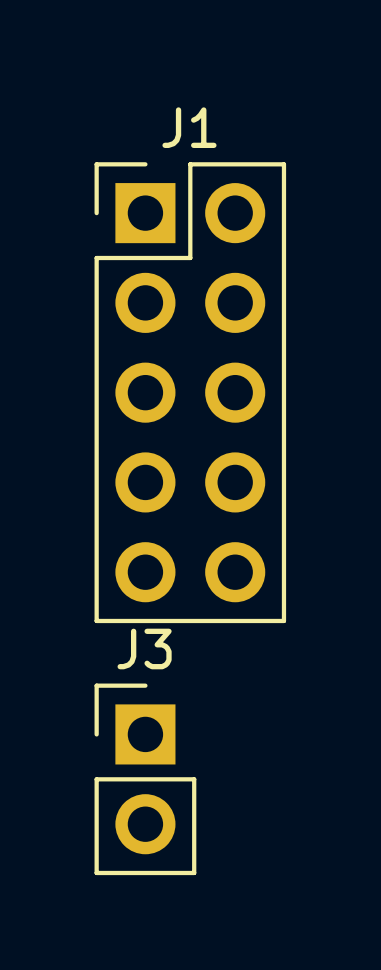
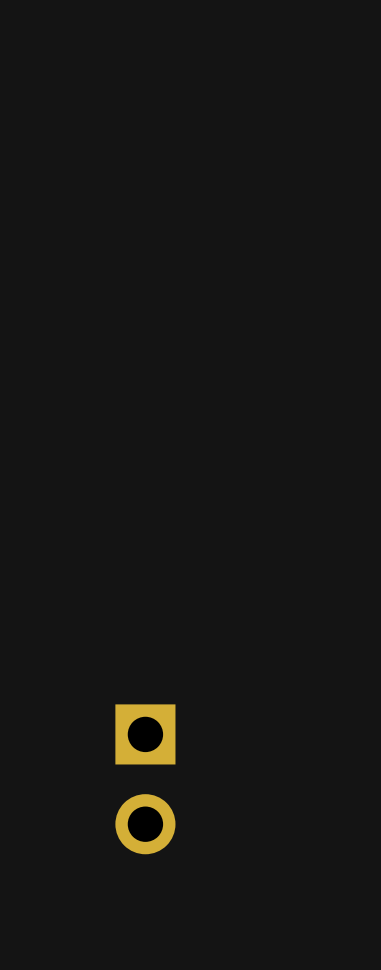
J1: (190, 392) -> none
J3 side: top (145, 779) -> bottom (145, 779)

